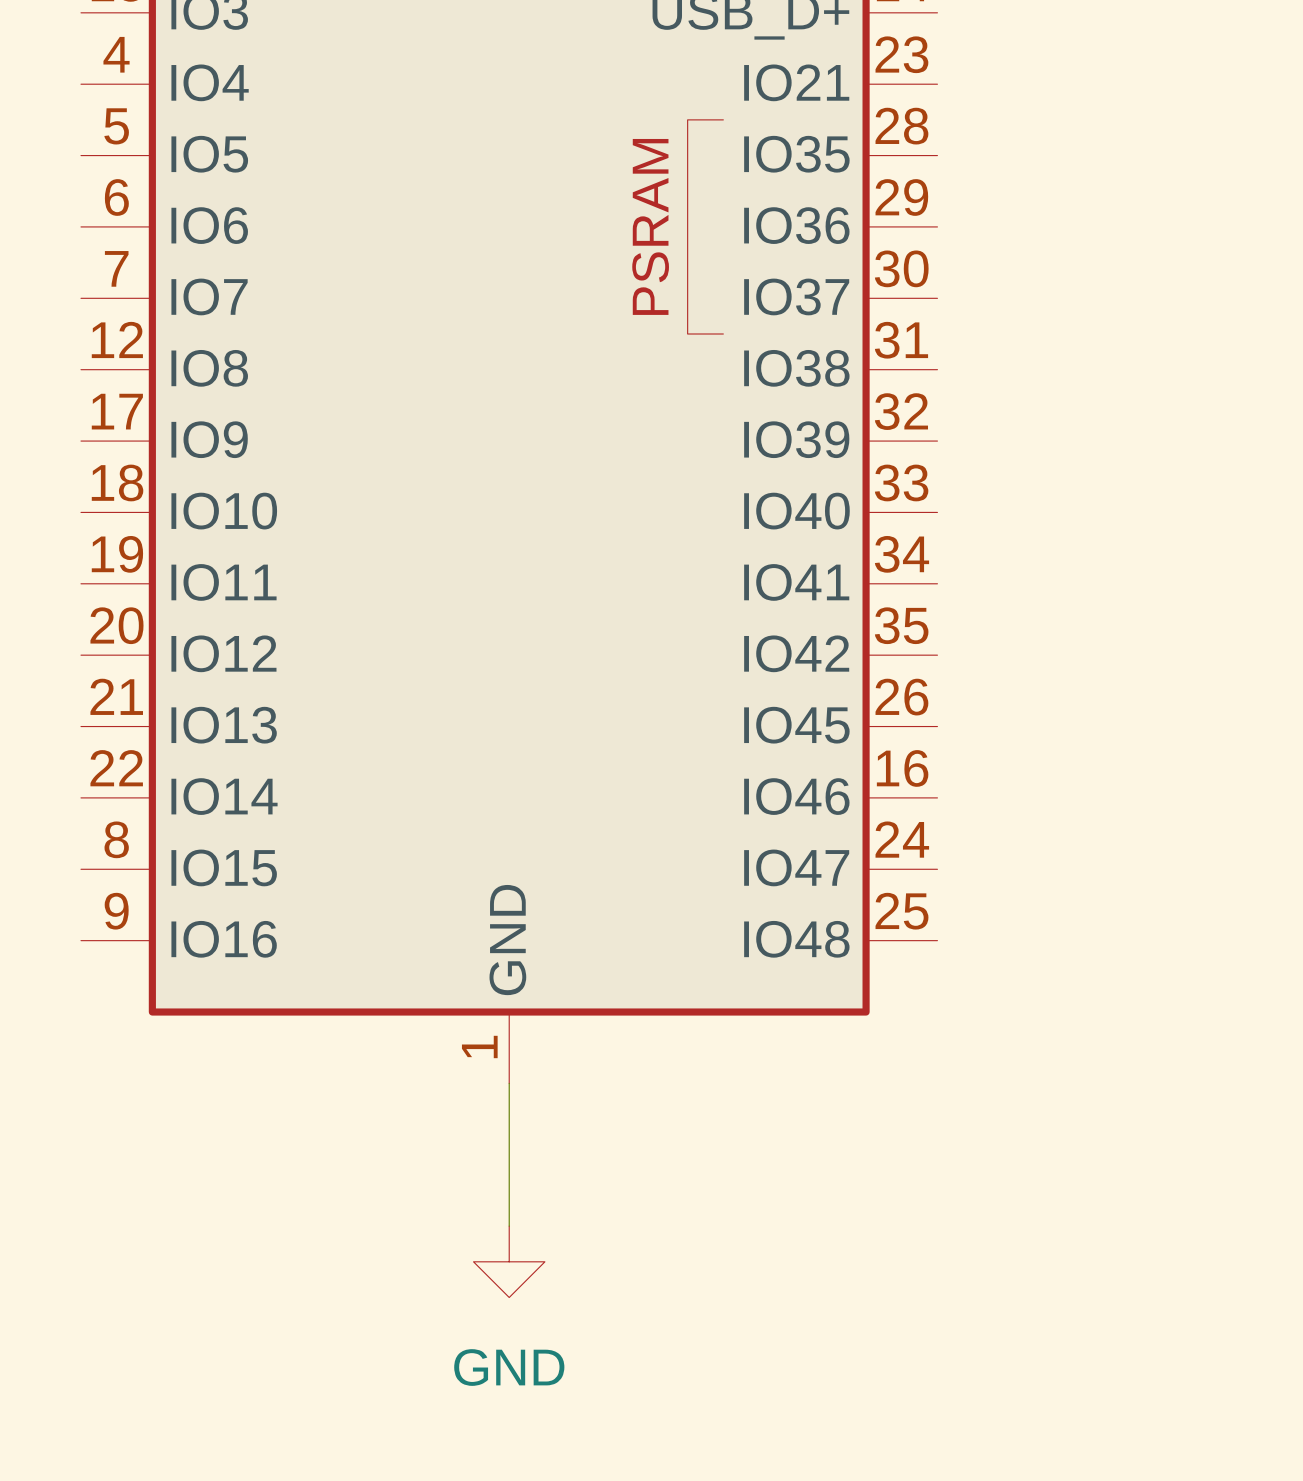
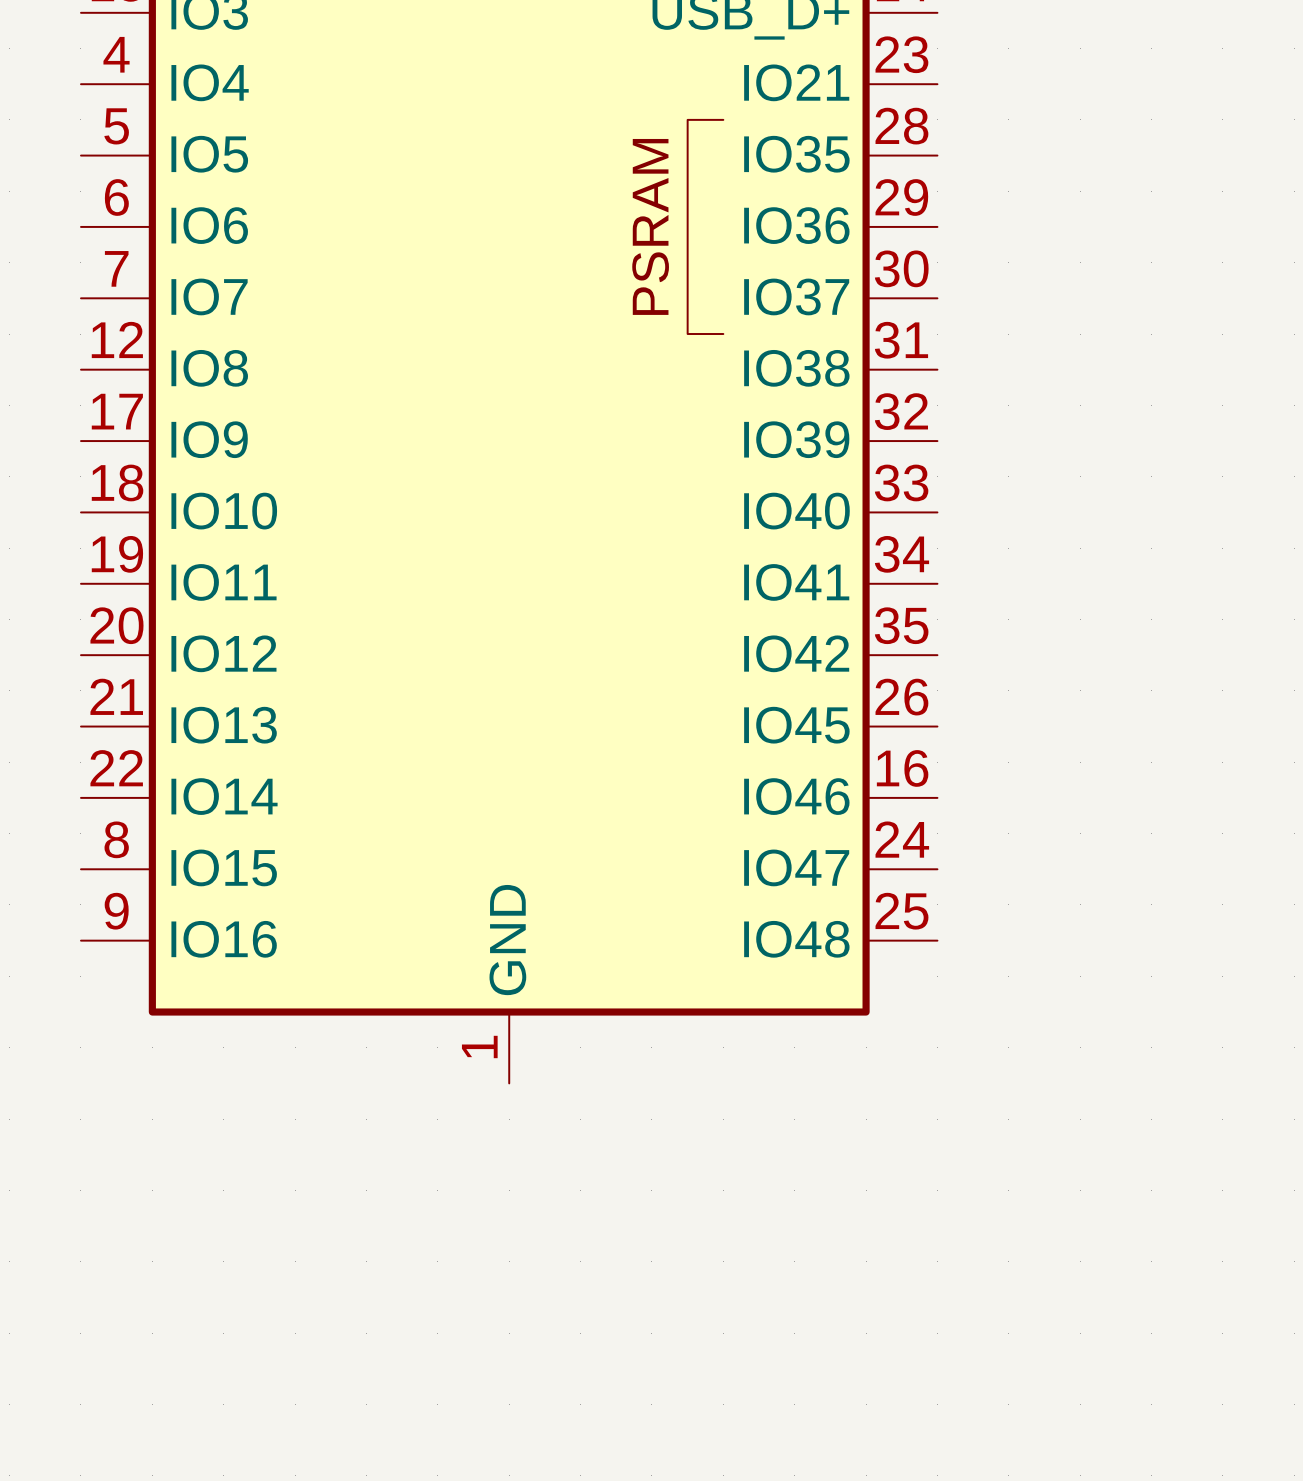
wire: (509, 1083) (509, 1226) -> none
power symbol: GND (509, 1261) -> none

